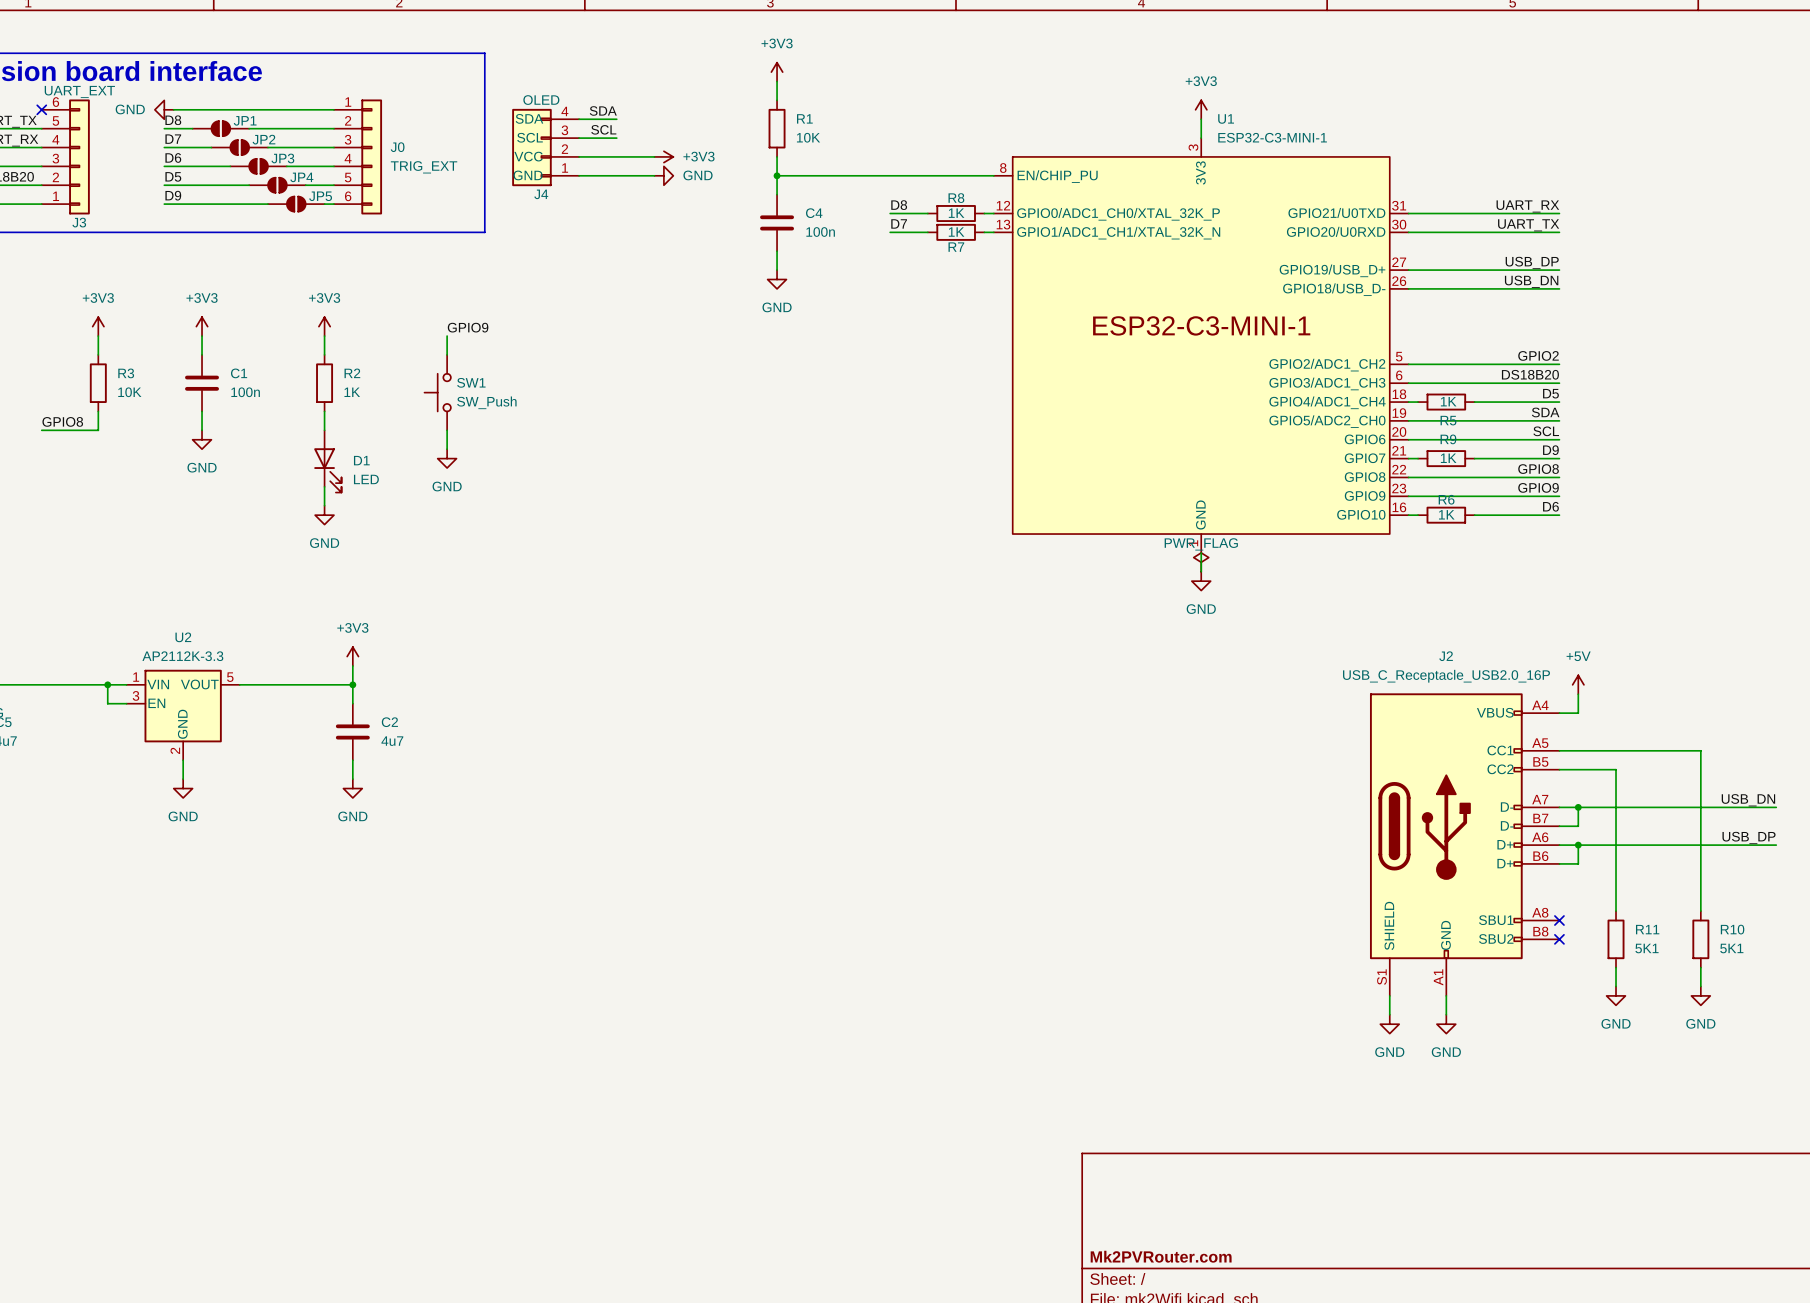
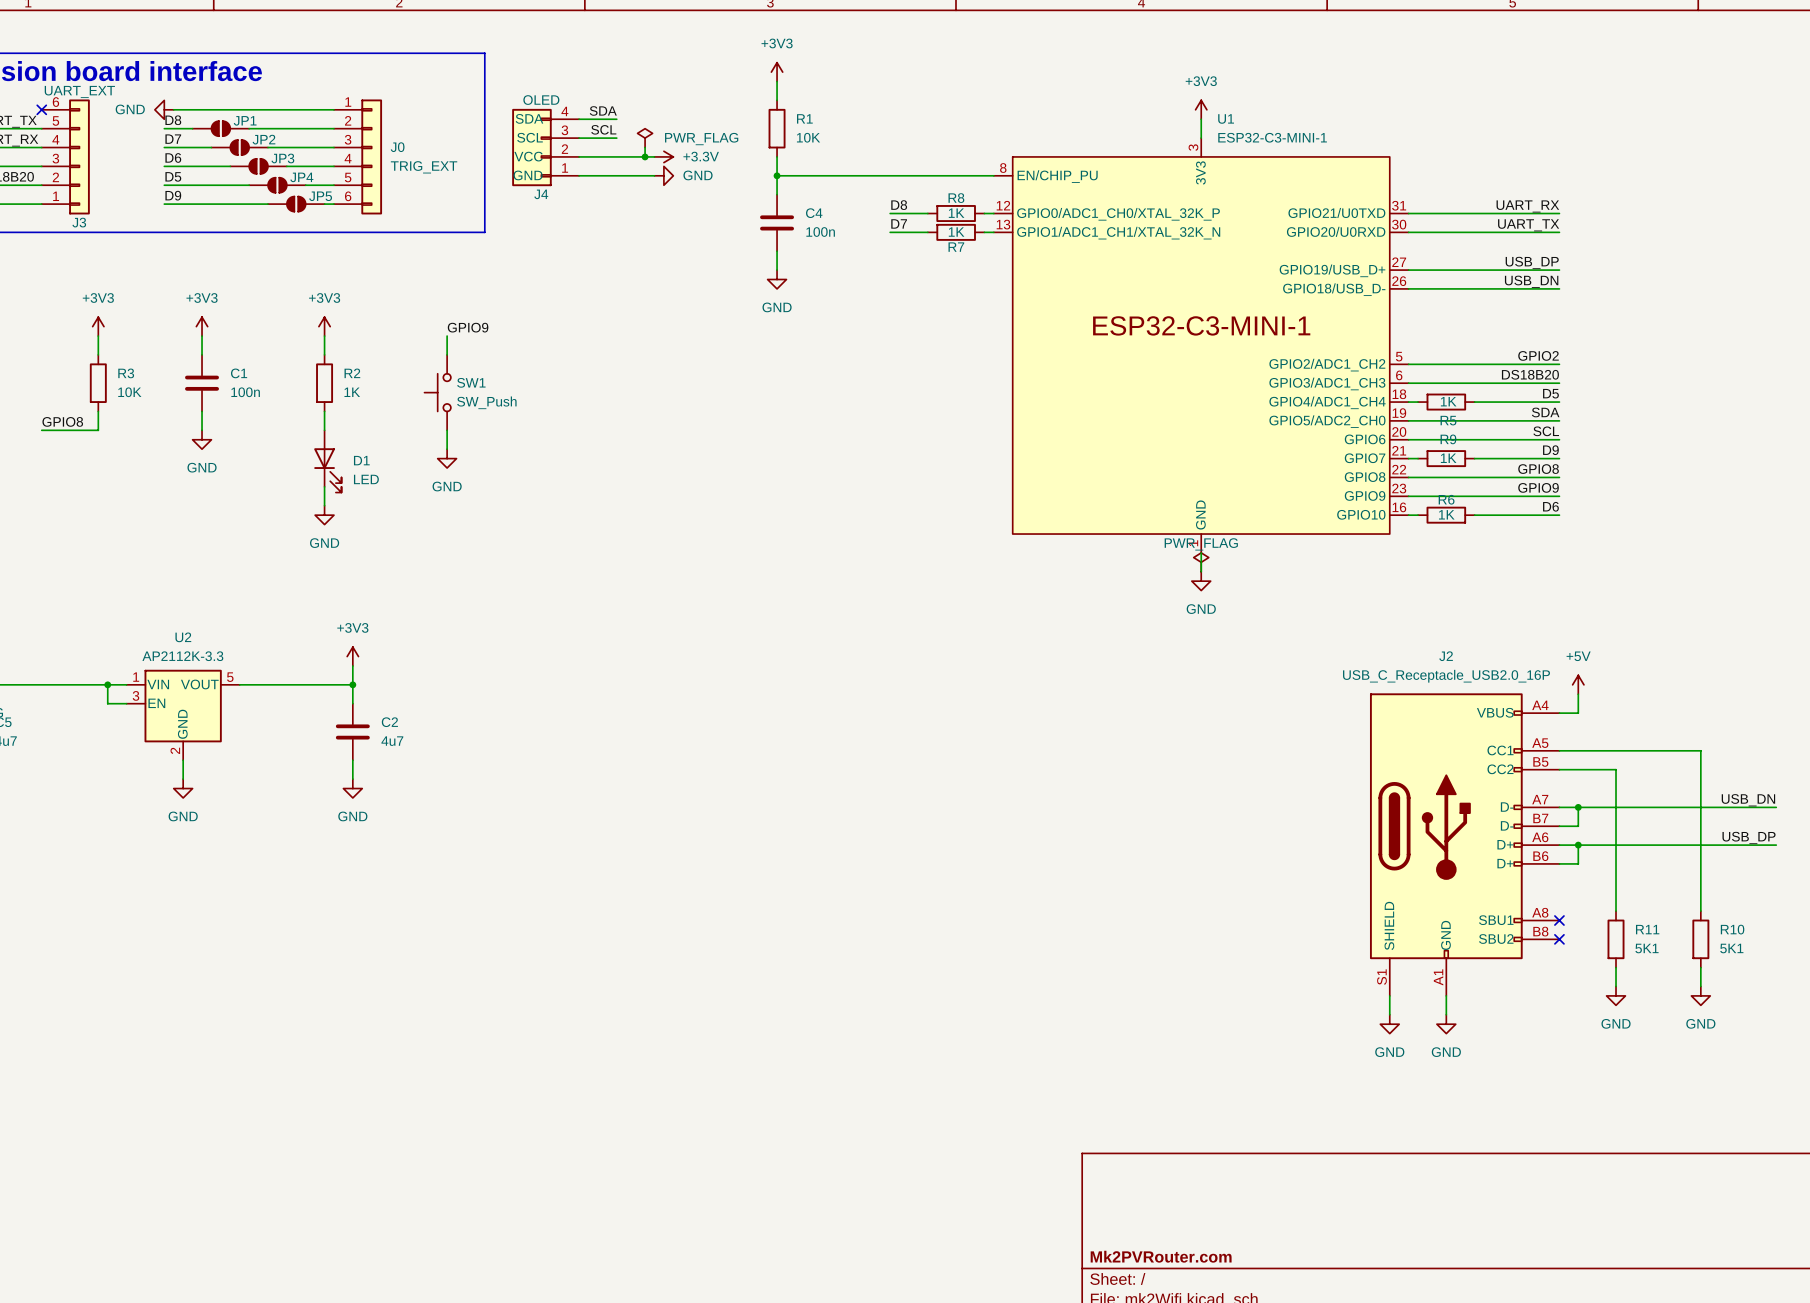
power symbol: none -> PWR_FLAG (645, 138)
wire: none -> (645, 147) (645, 156)
junction: none -> (645, 156)
power symbol: +3V3 (663, 156) -> +3.3V (663, 156)

